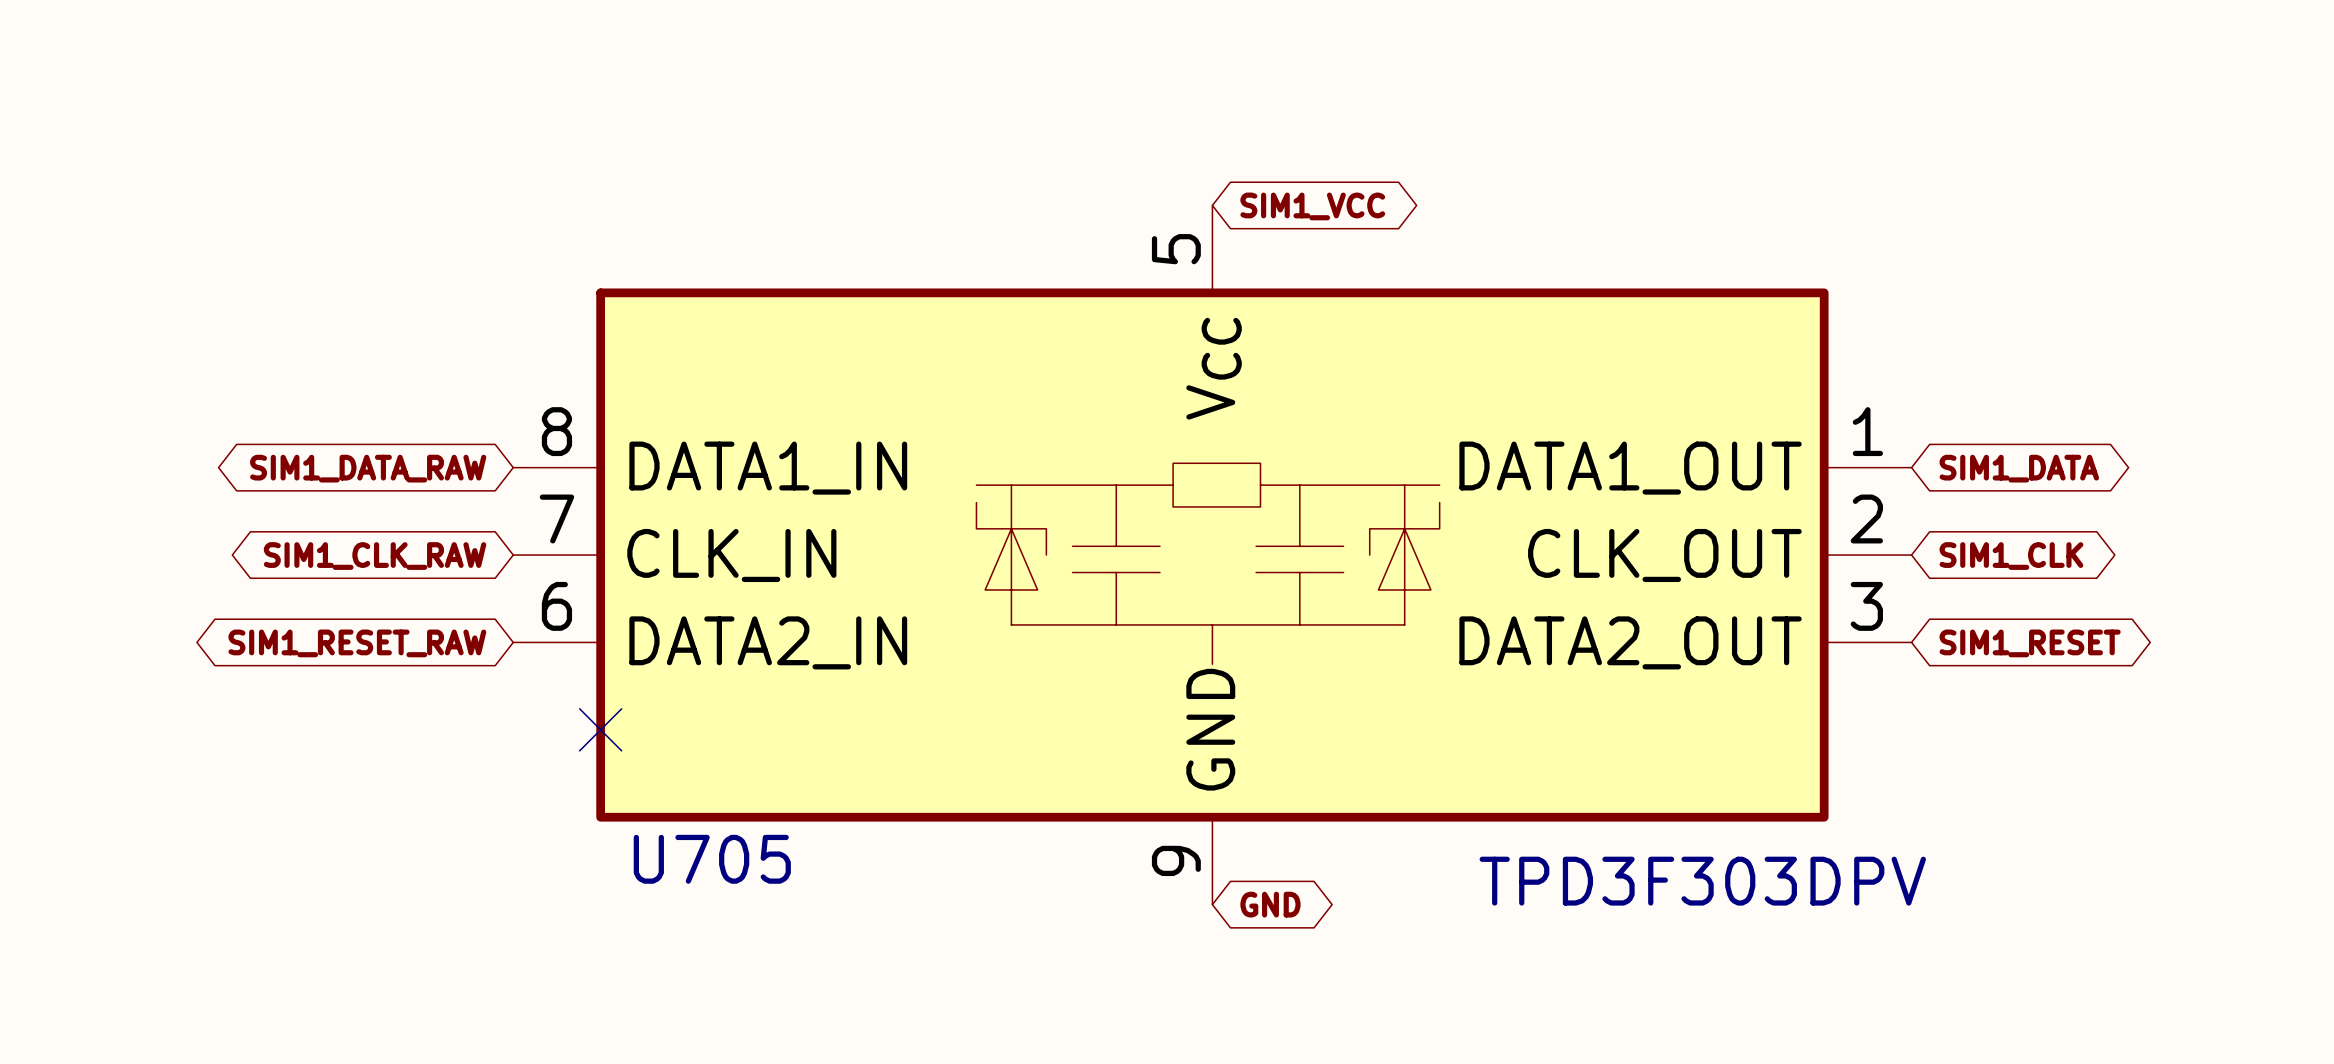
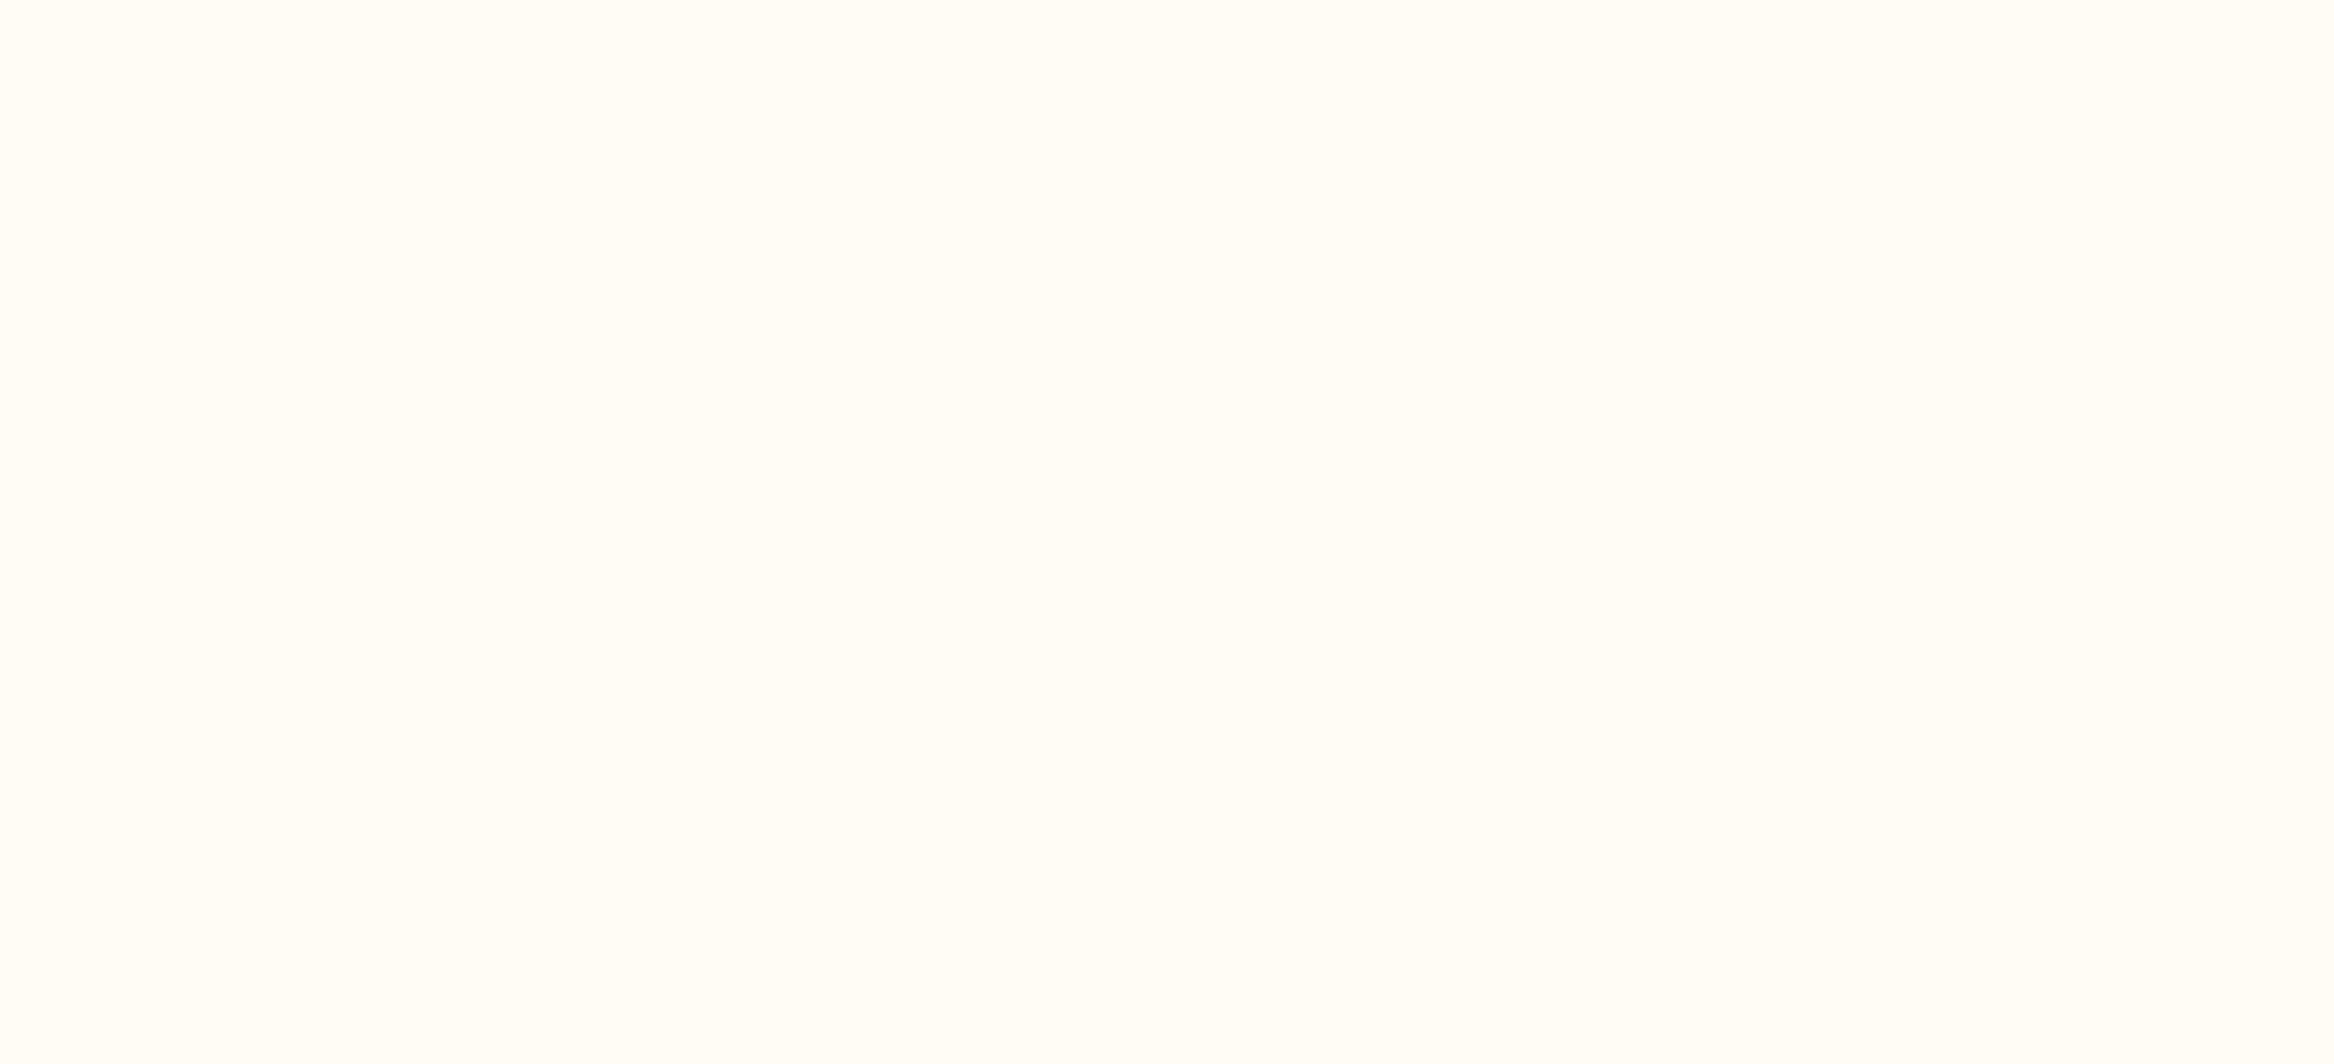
global label: SIM1_VCC (1312, 206) -> none
global label: SIM1_DATA_RAW (368, 468) -> none
global label: SIM1_DATA (2019, 468) -> none
U705: TPD3F303DPV (1212, 555) -> none
global label: SIM1_CLK_RAW (375, 556) -> none
global label: SIM1_CLK (2011, 556) -> none
global label: SIM1_RESET_RAW (357, 643) -> none
global label: SIM1_RESET (2030, 643) -> none
no-connect mark: (600, 729) -> none
global label: GND (1270, 904) -> none

